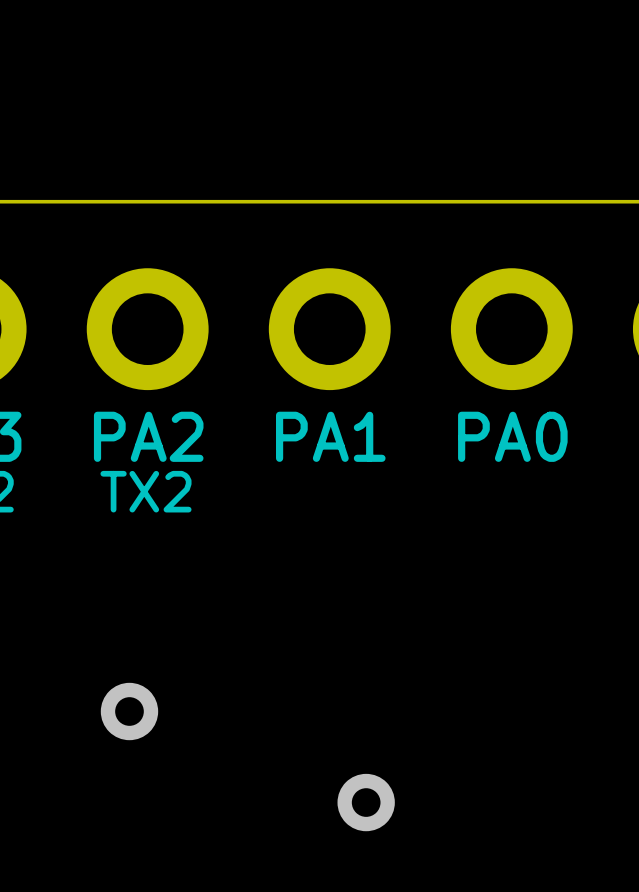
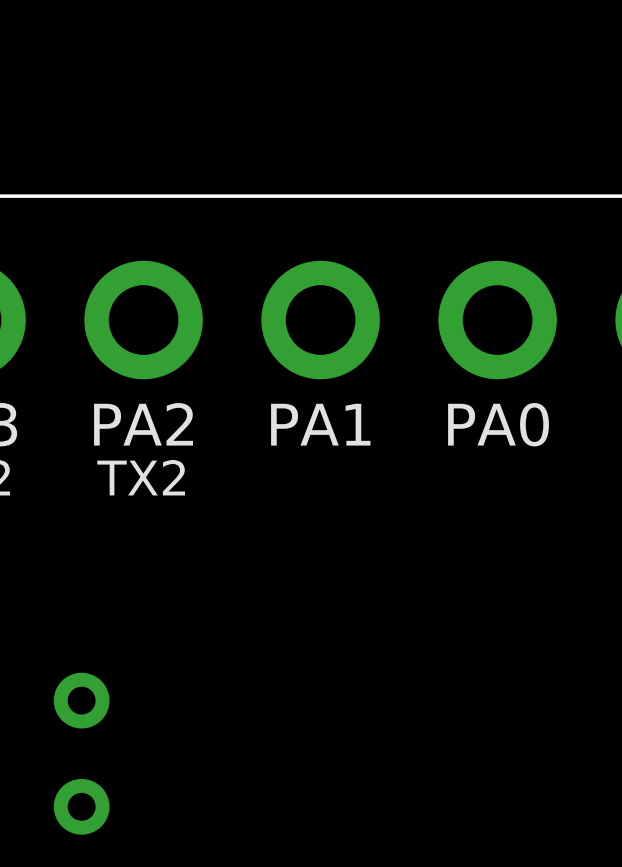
via position: (129, 711) -> (81, 700)
via: (366, 802) -> none
via: none -> (81, 806)

